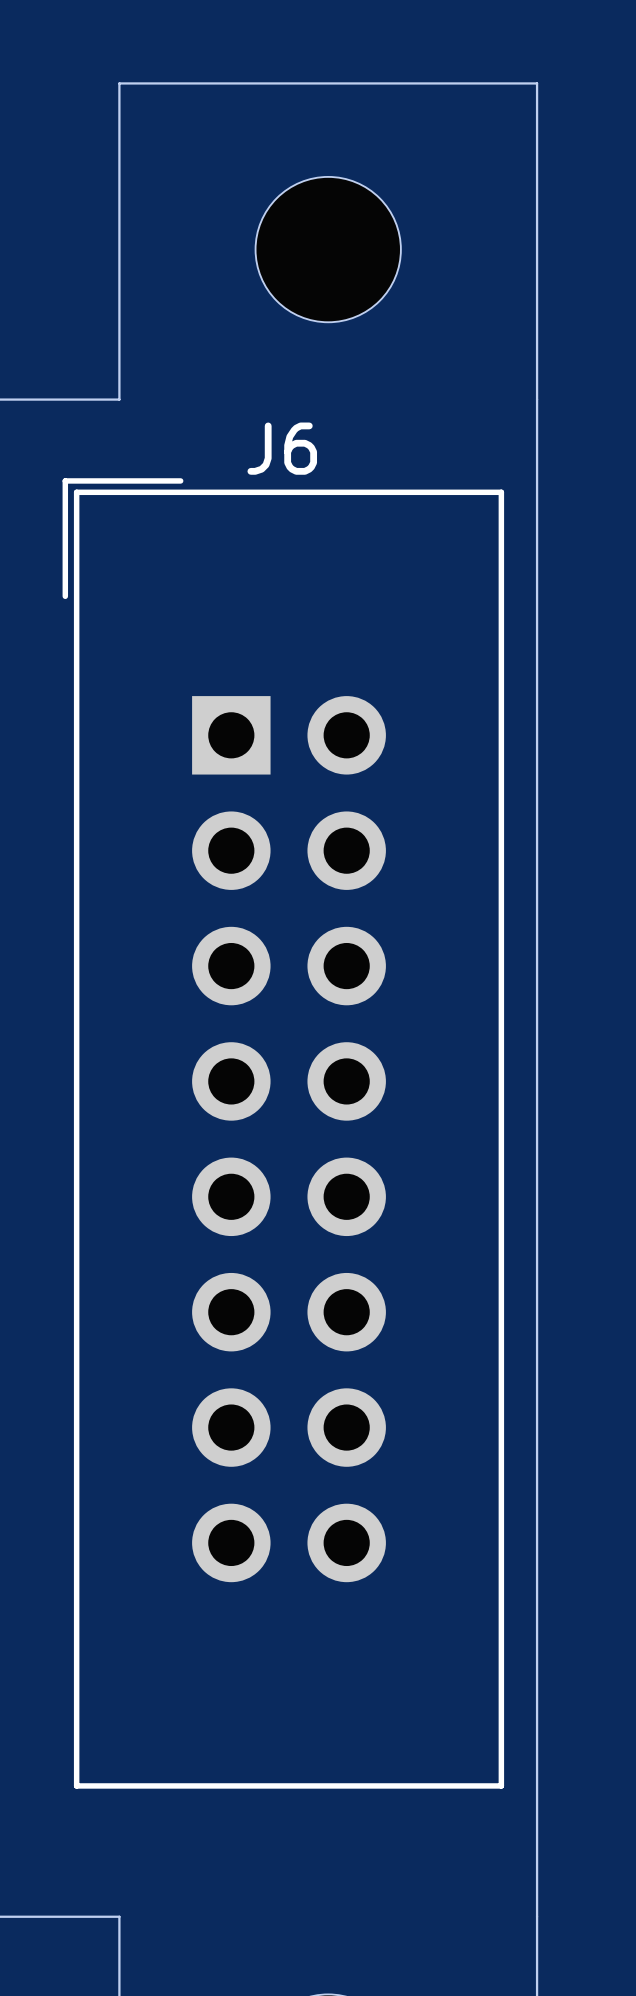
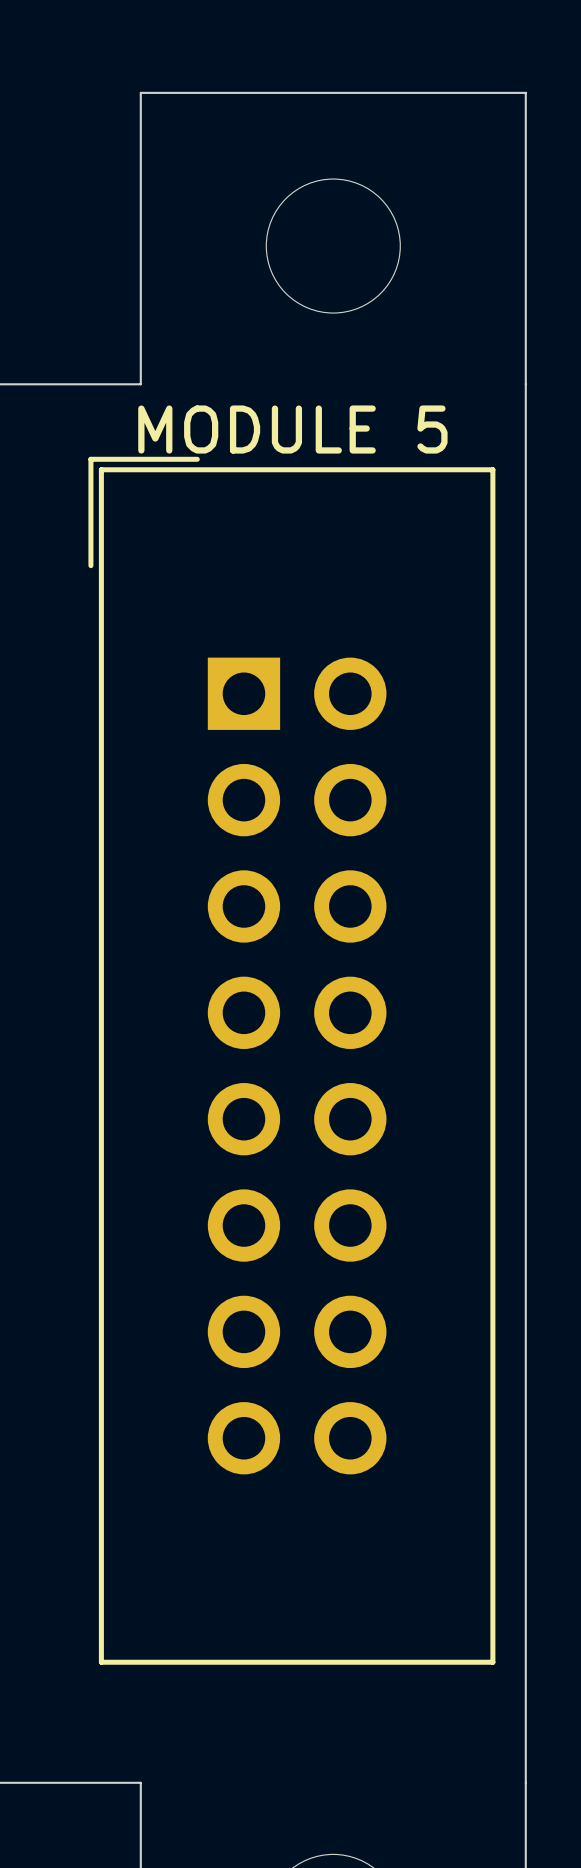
J6 name: J6 (282, 448) -> MODULE 5 (292, 429)

